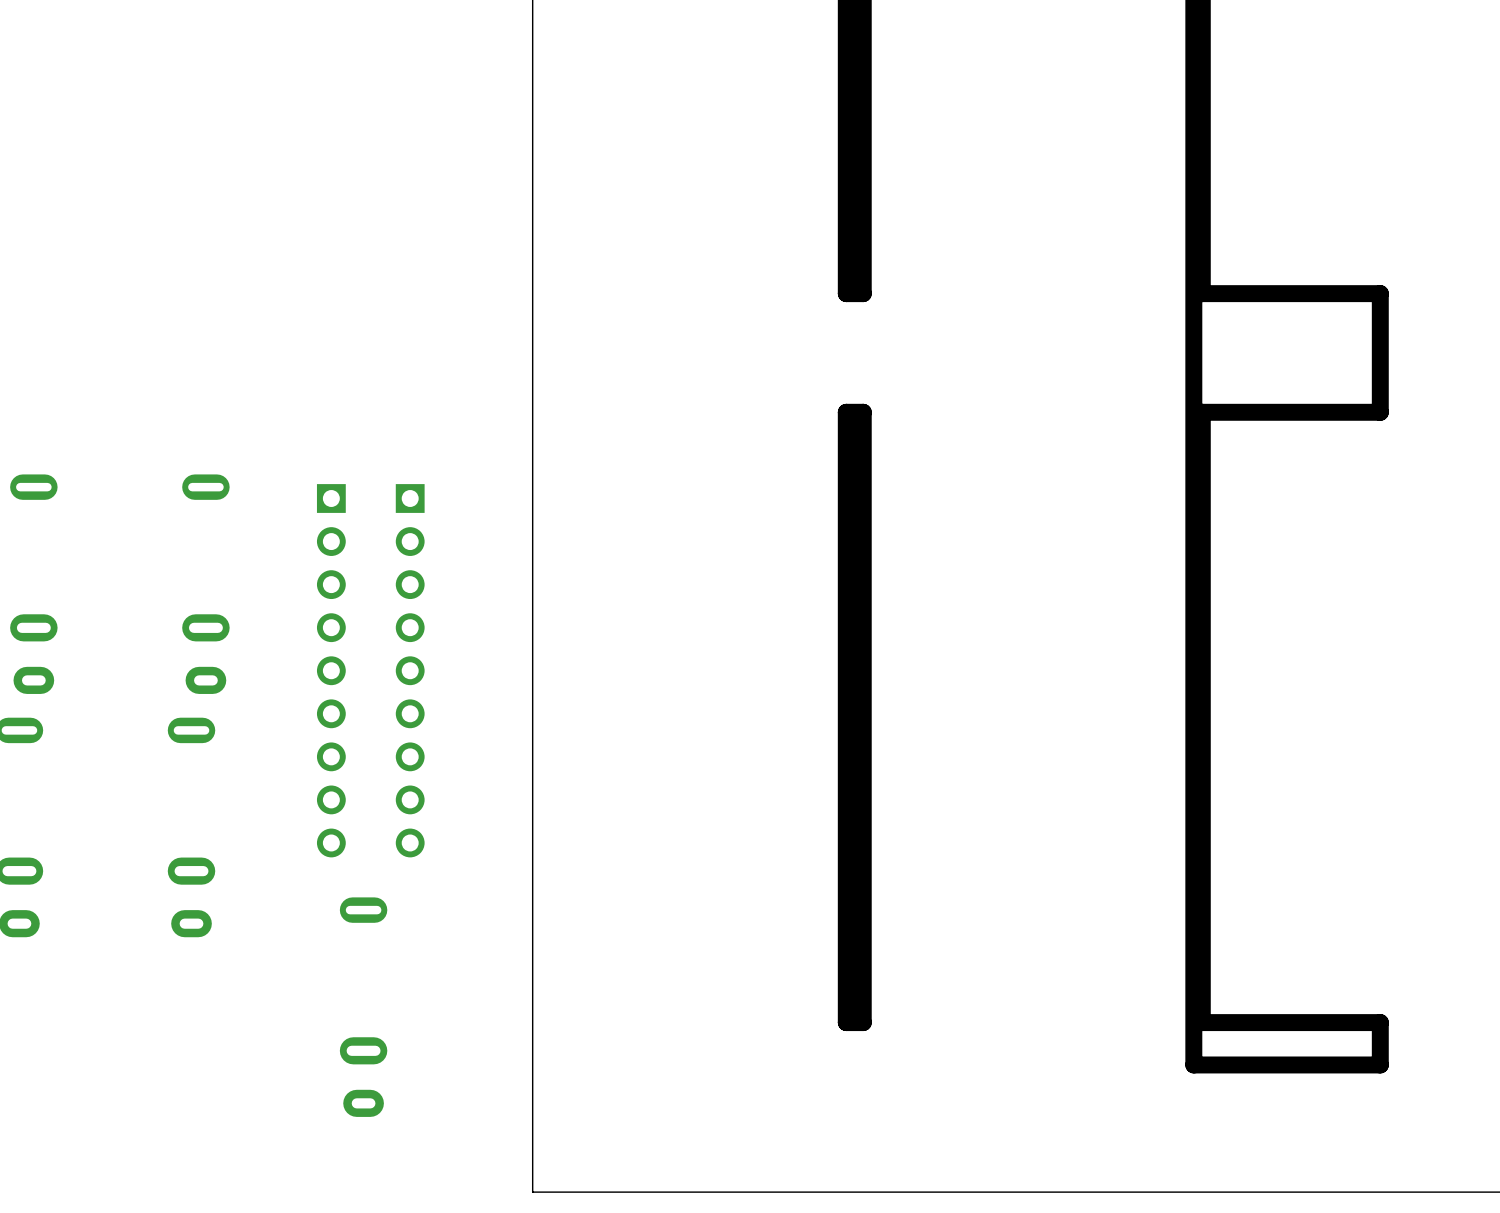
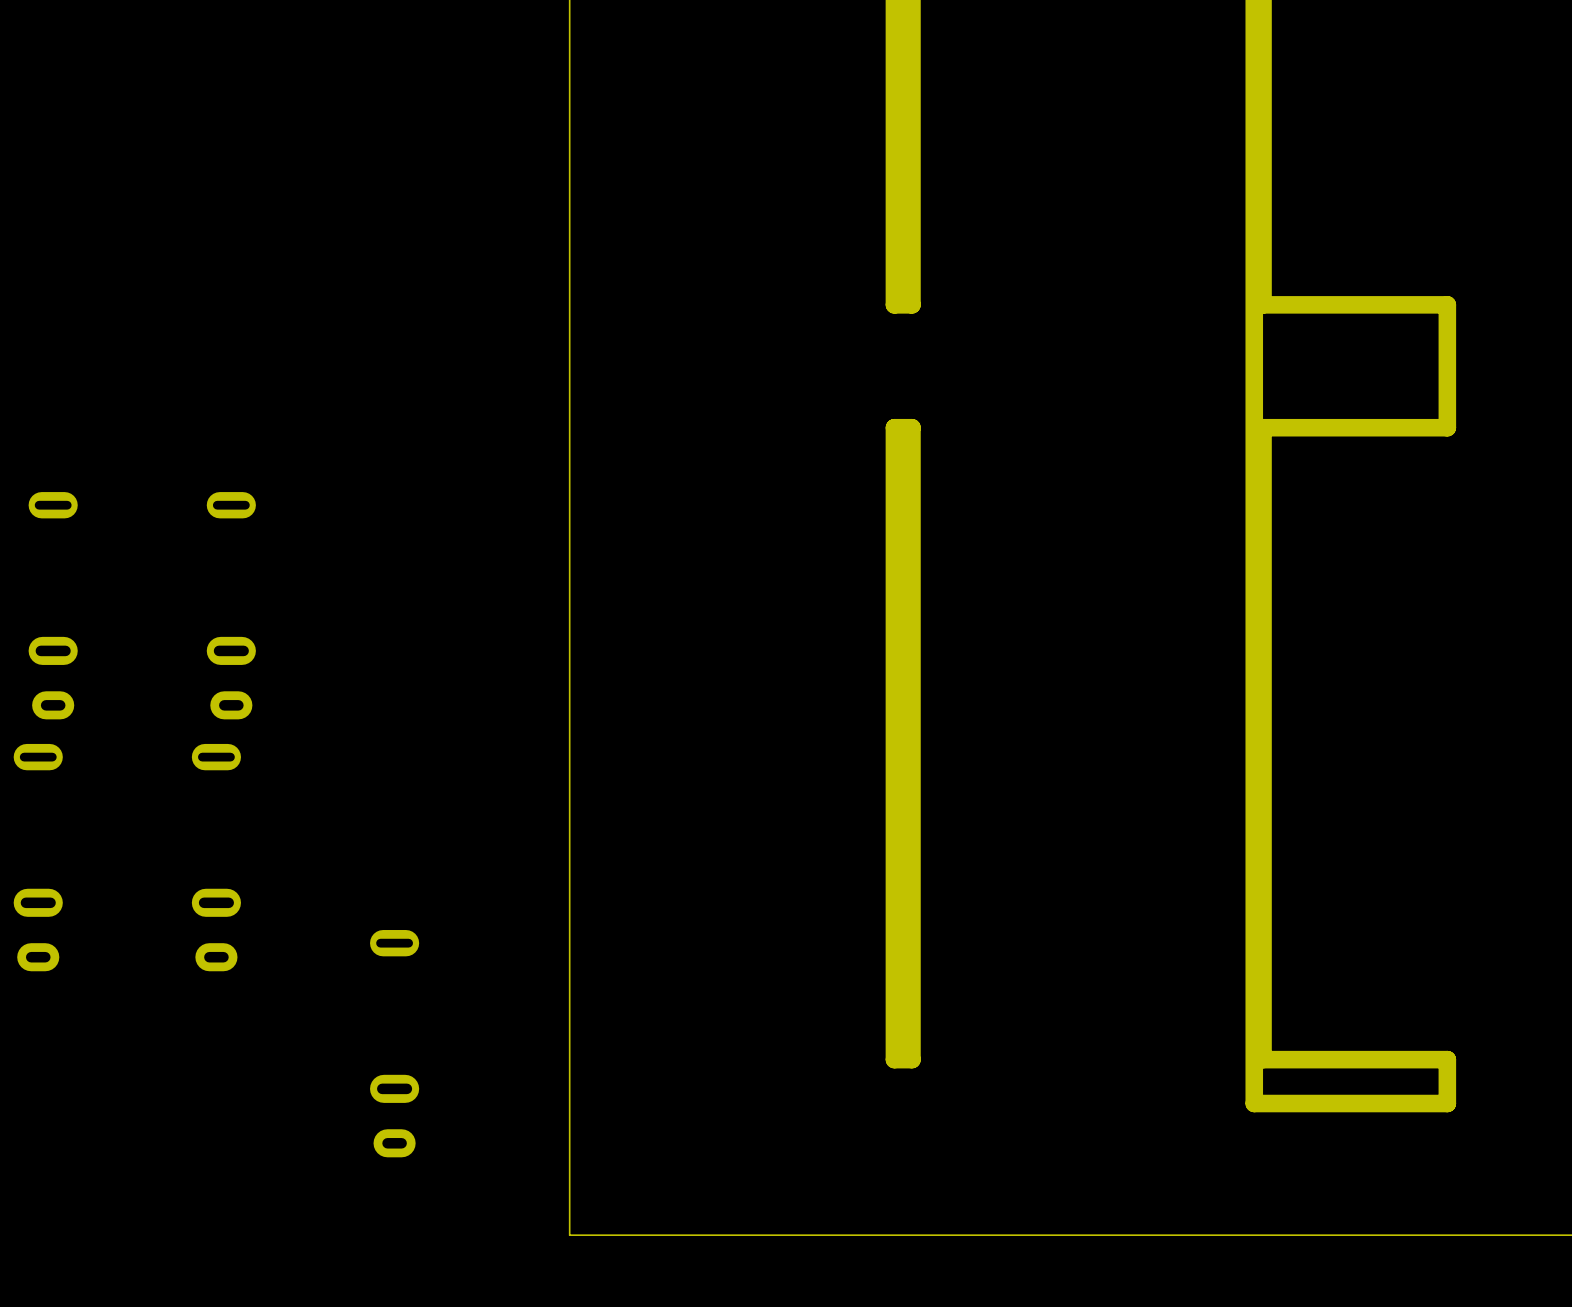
part: (331, 670) -> none
part: (410, 670) -> none

